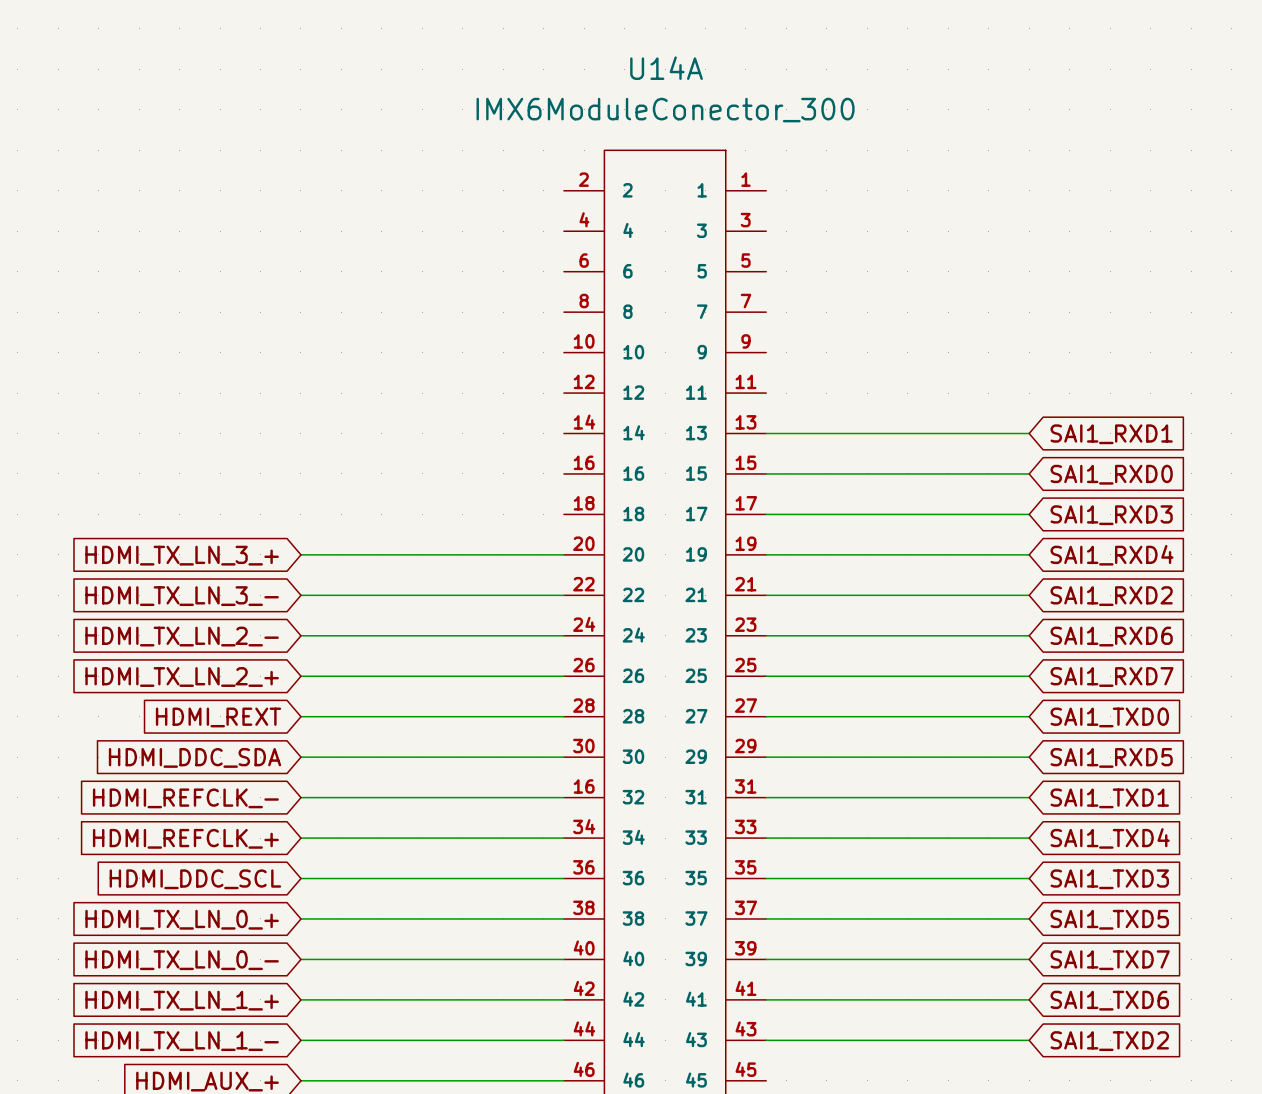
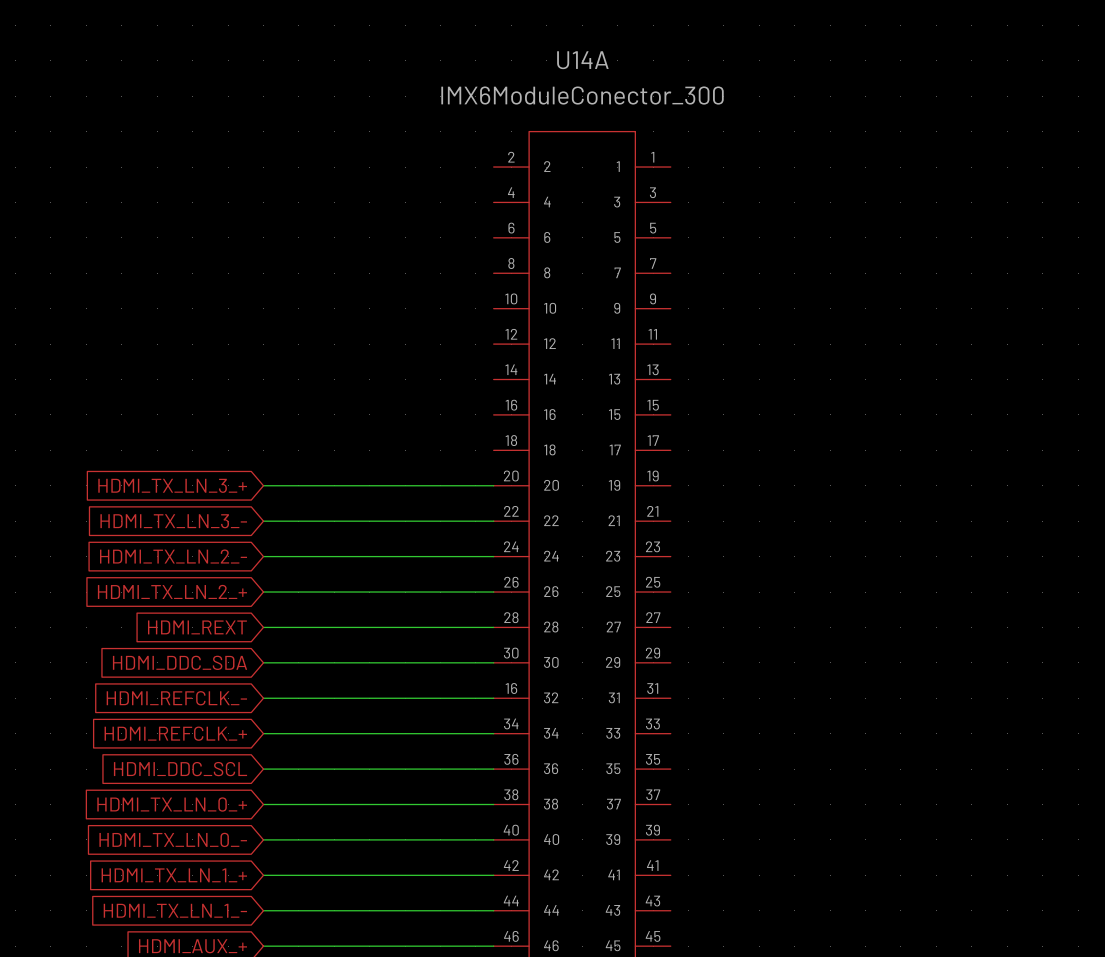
wire: (766, 433) (1029, 433) -> none
global label: SAI1_RXD1 (1111, 434) -> none
wire: (766, 473) (1029, 473) -> none
global label: SAI1_RXD0 (1111, 474) -> none
wire: (766, 514) (1029, 514) -> none
global label: SAI1_RXD3 (1111, 515) -> none
wire: (766, 554) (1029, 554) -> none
global label: SAI1_RXD4 (1112, 555) -> none
wire: (766, 595) (1029, 595) -> none
global label: SAI1_RXD2 (1111, 596) -> none
wire: (766, 635) (1029, 635) -> none
global label: SAI1_RXD6 (1111, 636) -> none
wire: (766, 676) (1029, 676) -> none
global label: SAI1_RXD7 (1112, 677) -> none
wire: (766, 716) (1029, 716) -> none
global label: SAI1_TXD0 (1109, 717) -> none
wire: (766, 757) (1029, 757) -> none
global label: SAI1_RXD5 (1111, 757) -> none
wire: (766, 797) (1029, 797) -> none
global label: SAI1_TXD1 (1109, 798) -> none
wire: (766, 838) (1029, 838) -> none
global label: SAI1_TXD4 (1110, 838) -> none
wire: (766, 878) (1029, 878) -> none
global label: SAI1_TXD3 (1109, 879) -> none
wire: (766, 918) (1029, 918) -> none
global label: SAI1_TXD5 (1109, 919) -> none
wire: (766, 959) (1029, 959) -> none
global label: SAI1_TXD7 (1110, 960) -> none
wire: (766, 999) (1029, 999) -> none
global label: SAI1_TXD6 (1109, 1000) -> none
wire: (766, 1040) (1029, 1040) -> none
global label: SAI1_TXD2 (1109, 1041) -> none

